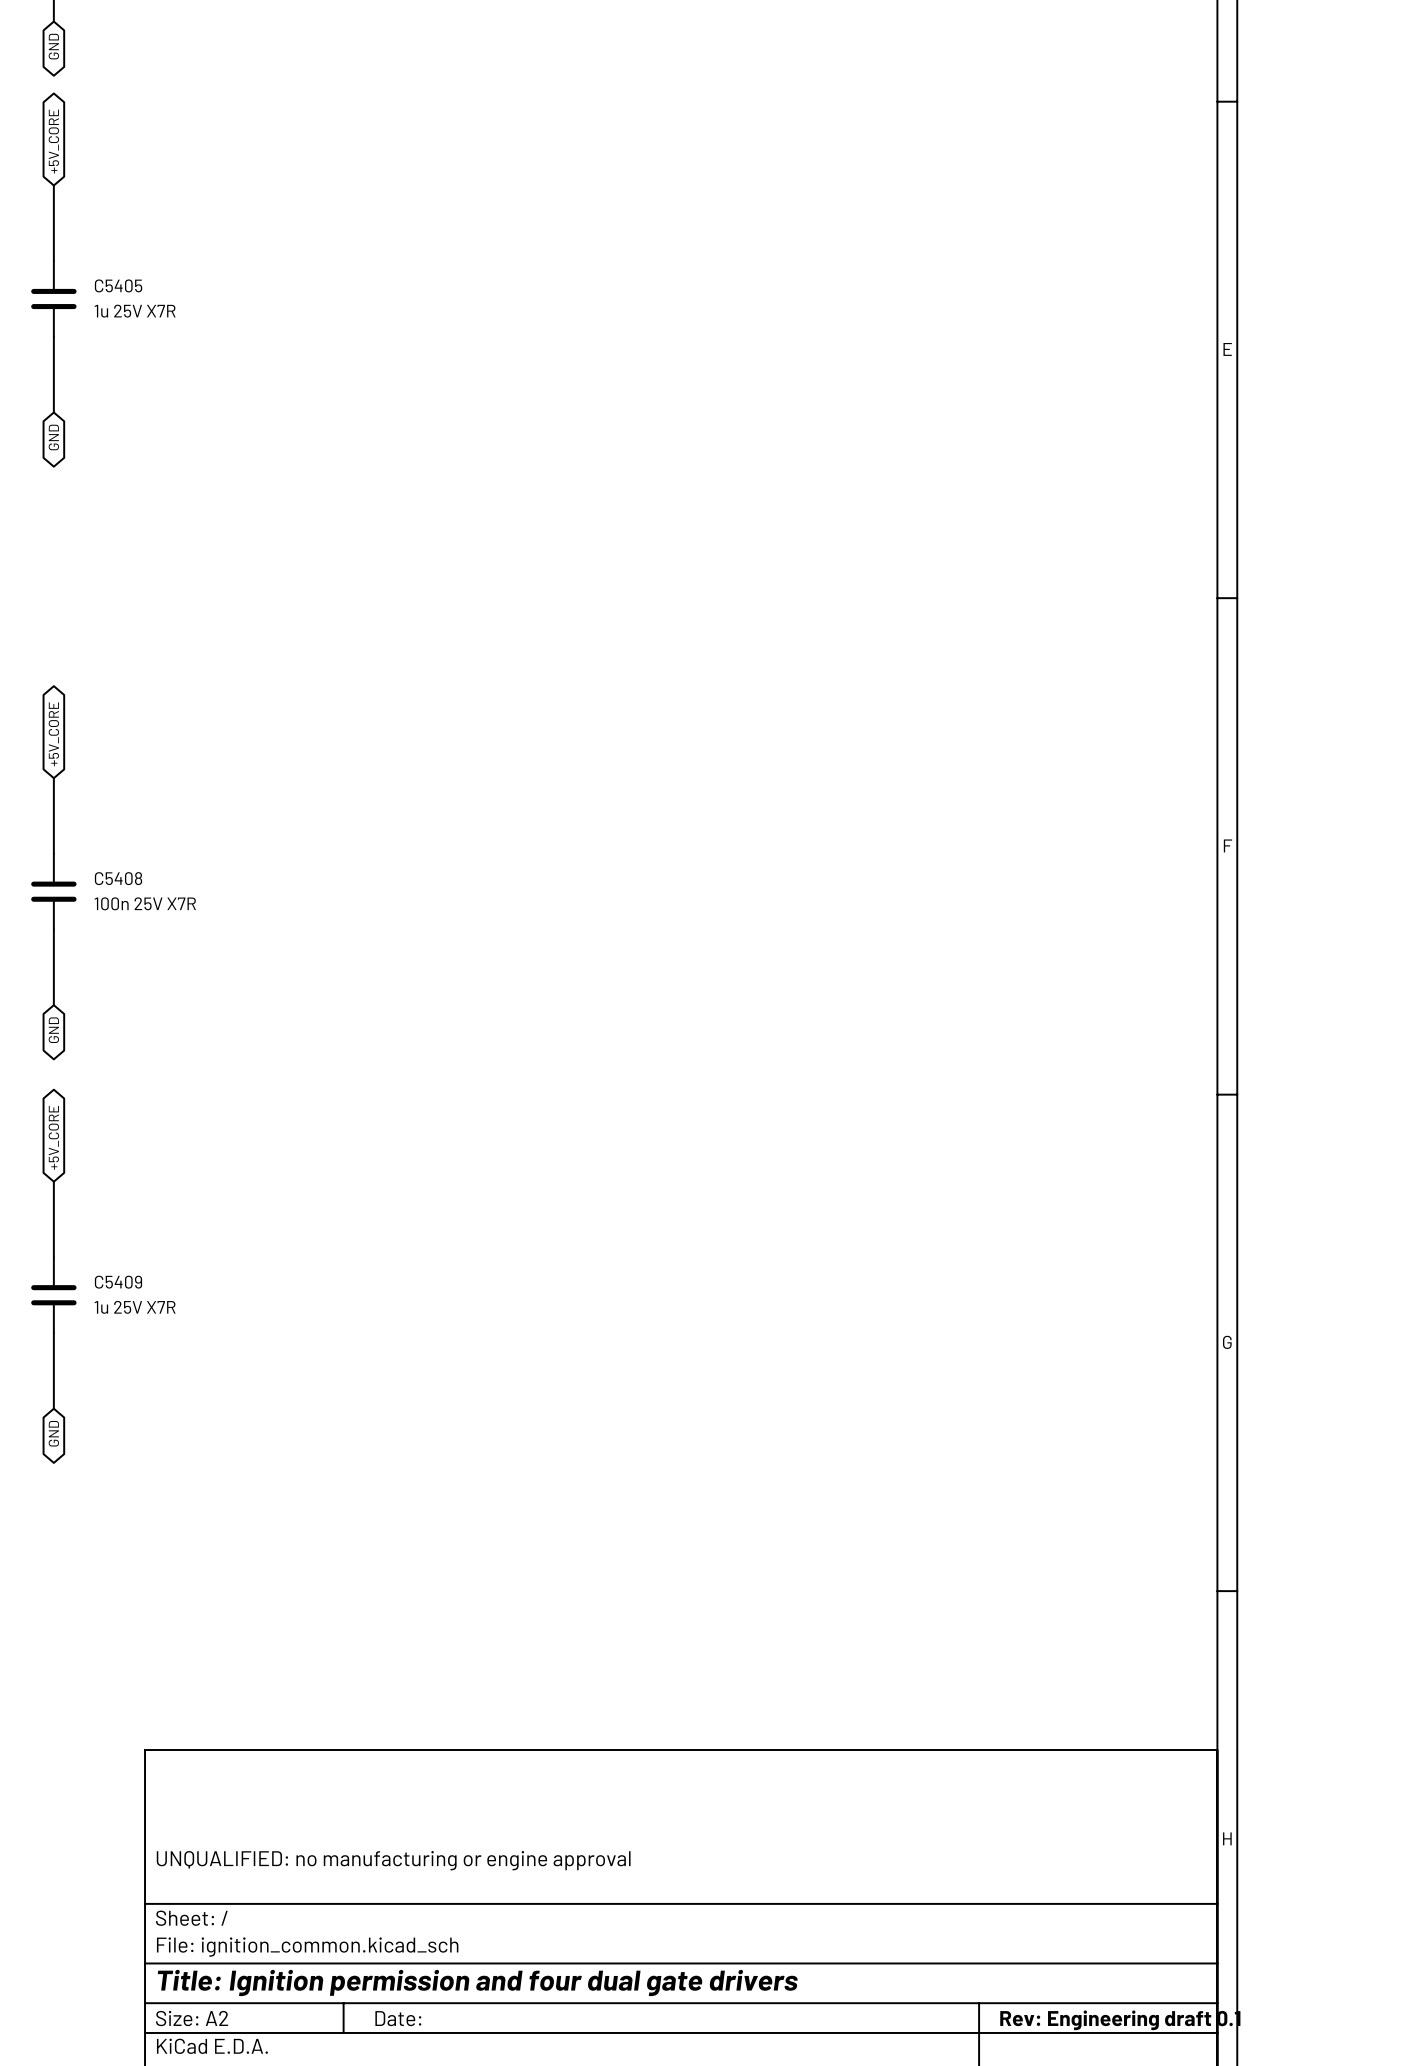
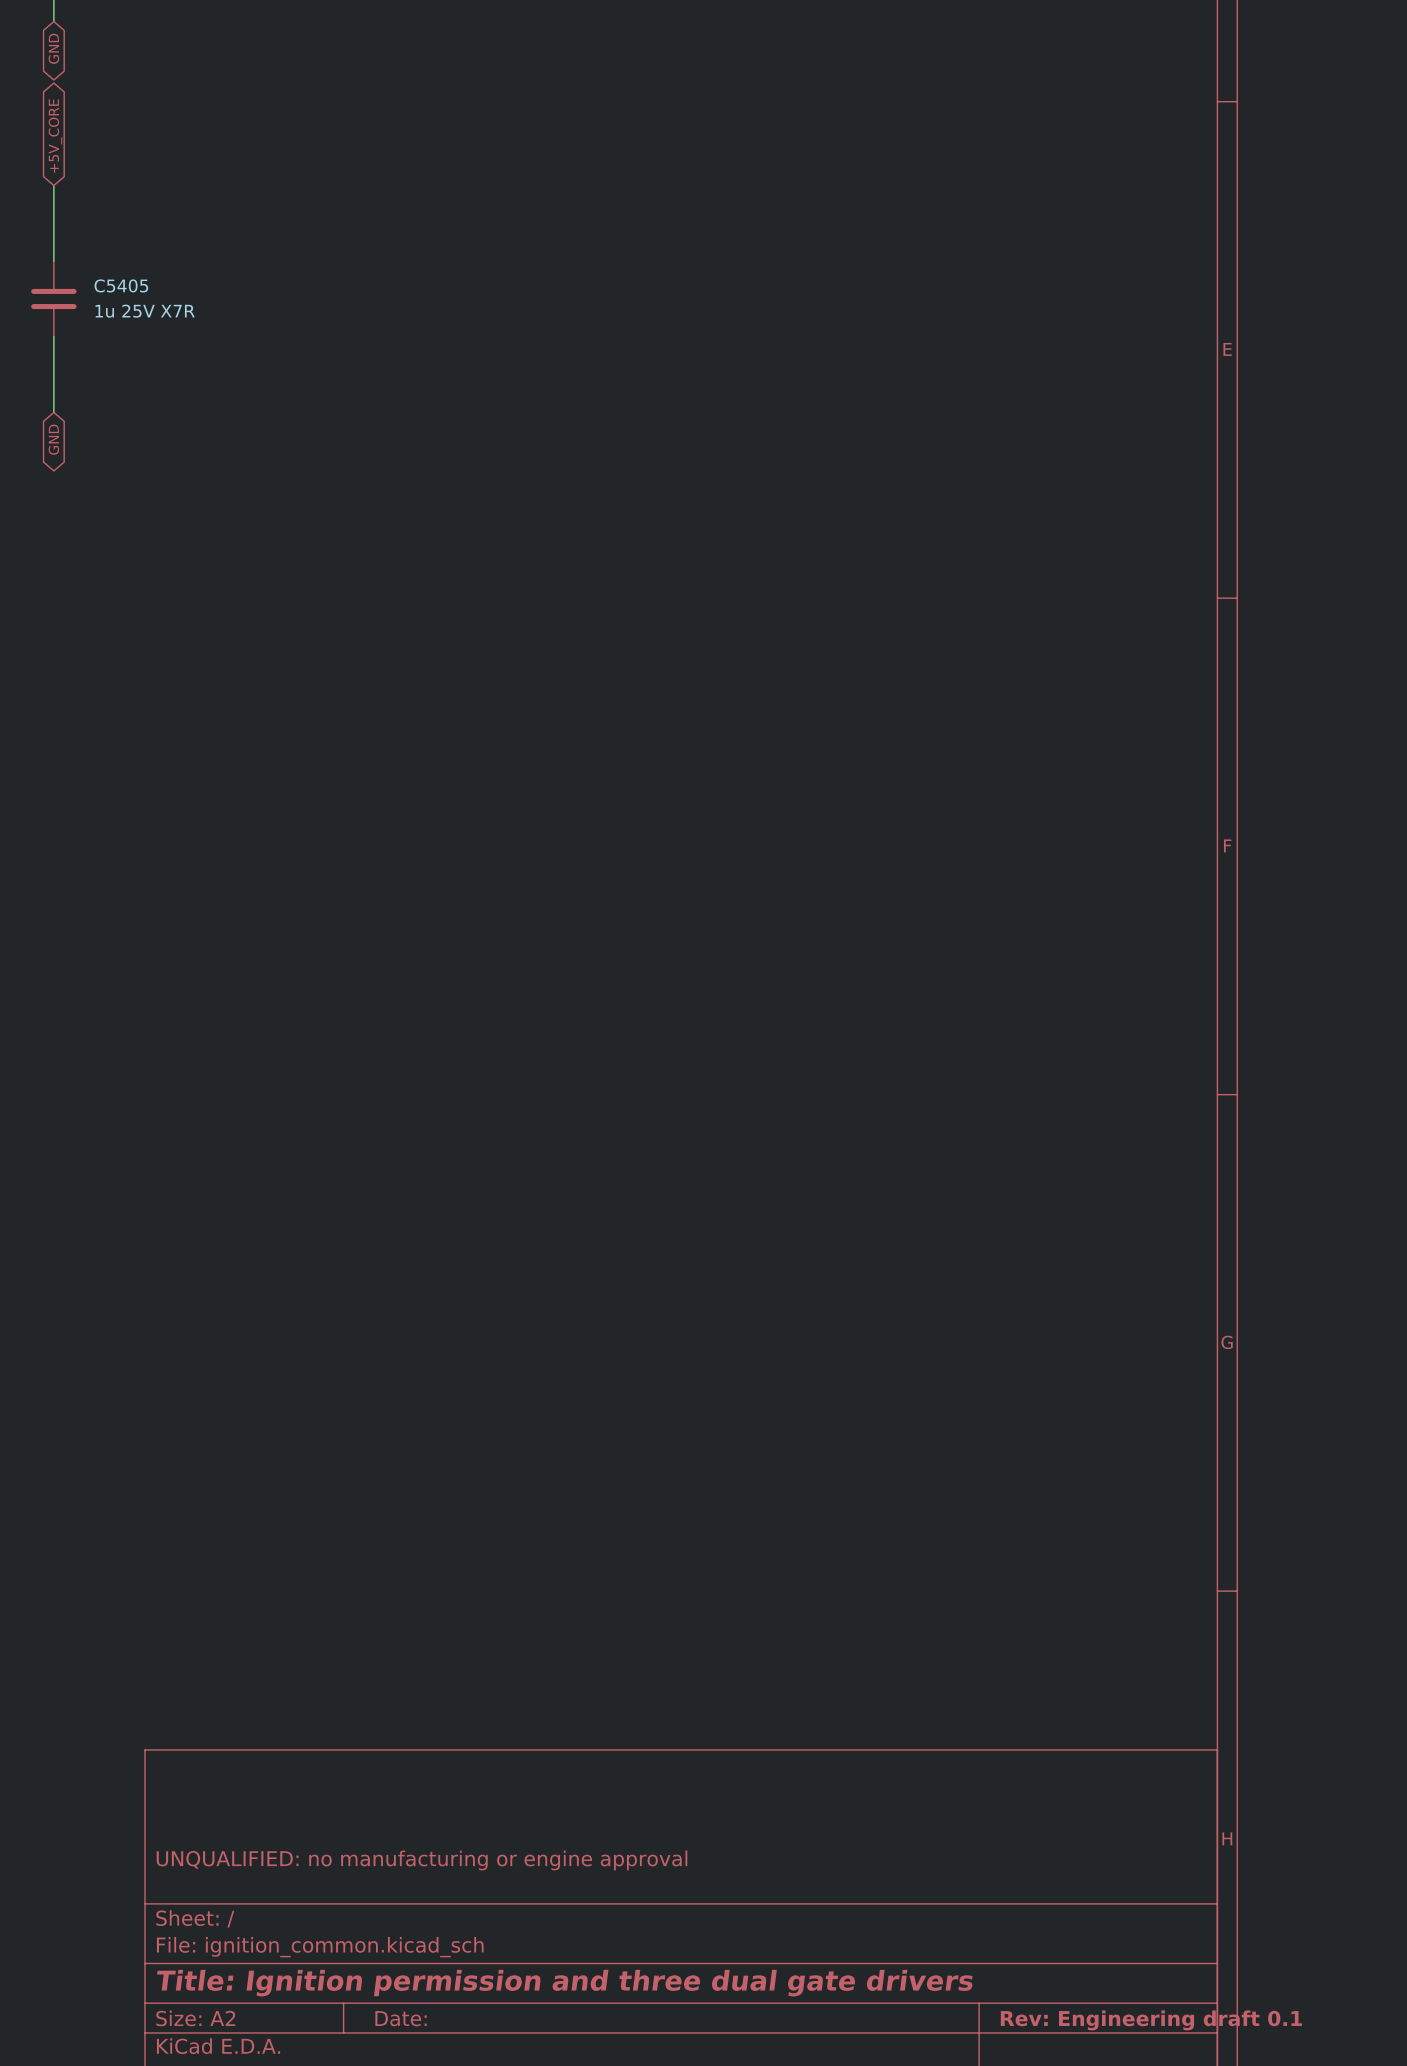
global label: +5V_CORE (53, 734) -> none
wire: (53, 778) (53, 853) -> none
C5408: 100n 25V X7R (53, 891) -> none
wire: (53, 929) (53, 1005) -> none
global label: GND (53, 1030) -> none
global label: +5V_CORE (53, 1137) -> none
wire: (53, 1181) (53, 1257) -> none
C5409: 1u 25V X7R (53, 1295) -> none
wire: (53, 1333) (53, 1408) -> none
global label: GND (53, 1433) -> none
title block: Title: Ignition permission and four dual gate drivers (477, 1982) -> Title: Ignition permission and three dual gate drivers (564, 1983)

